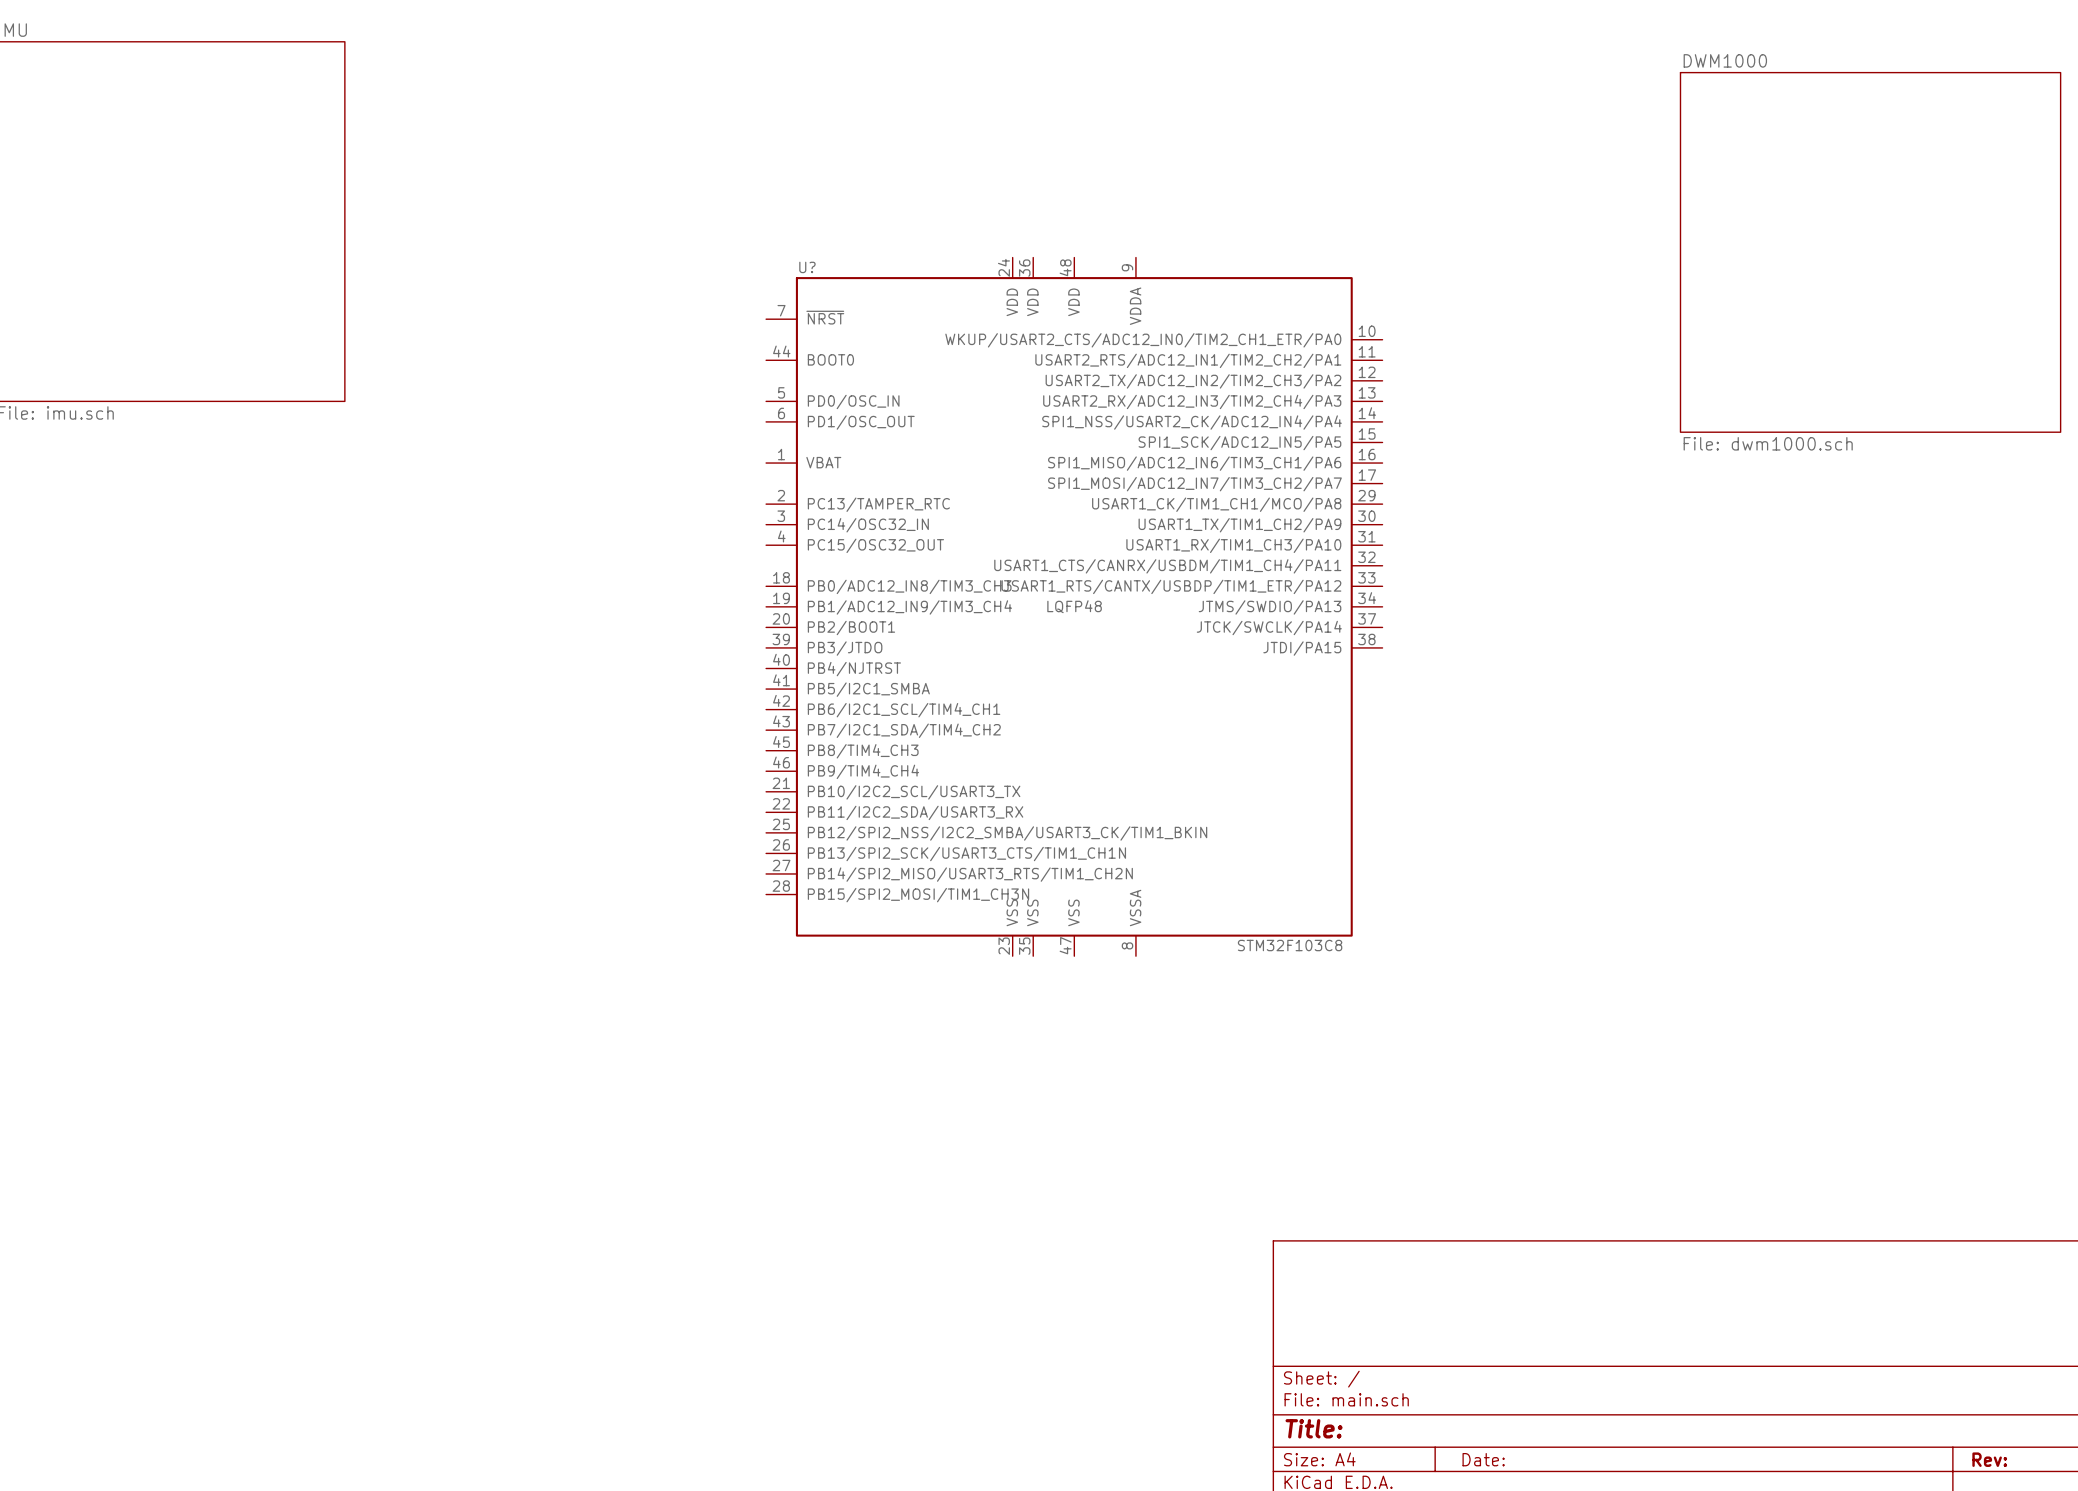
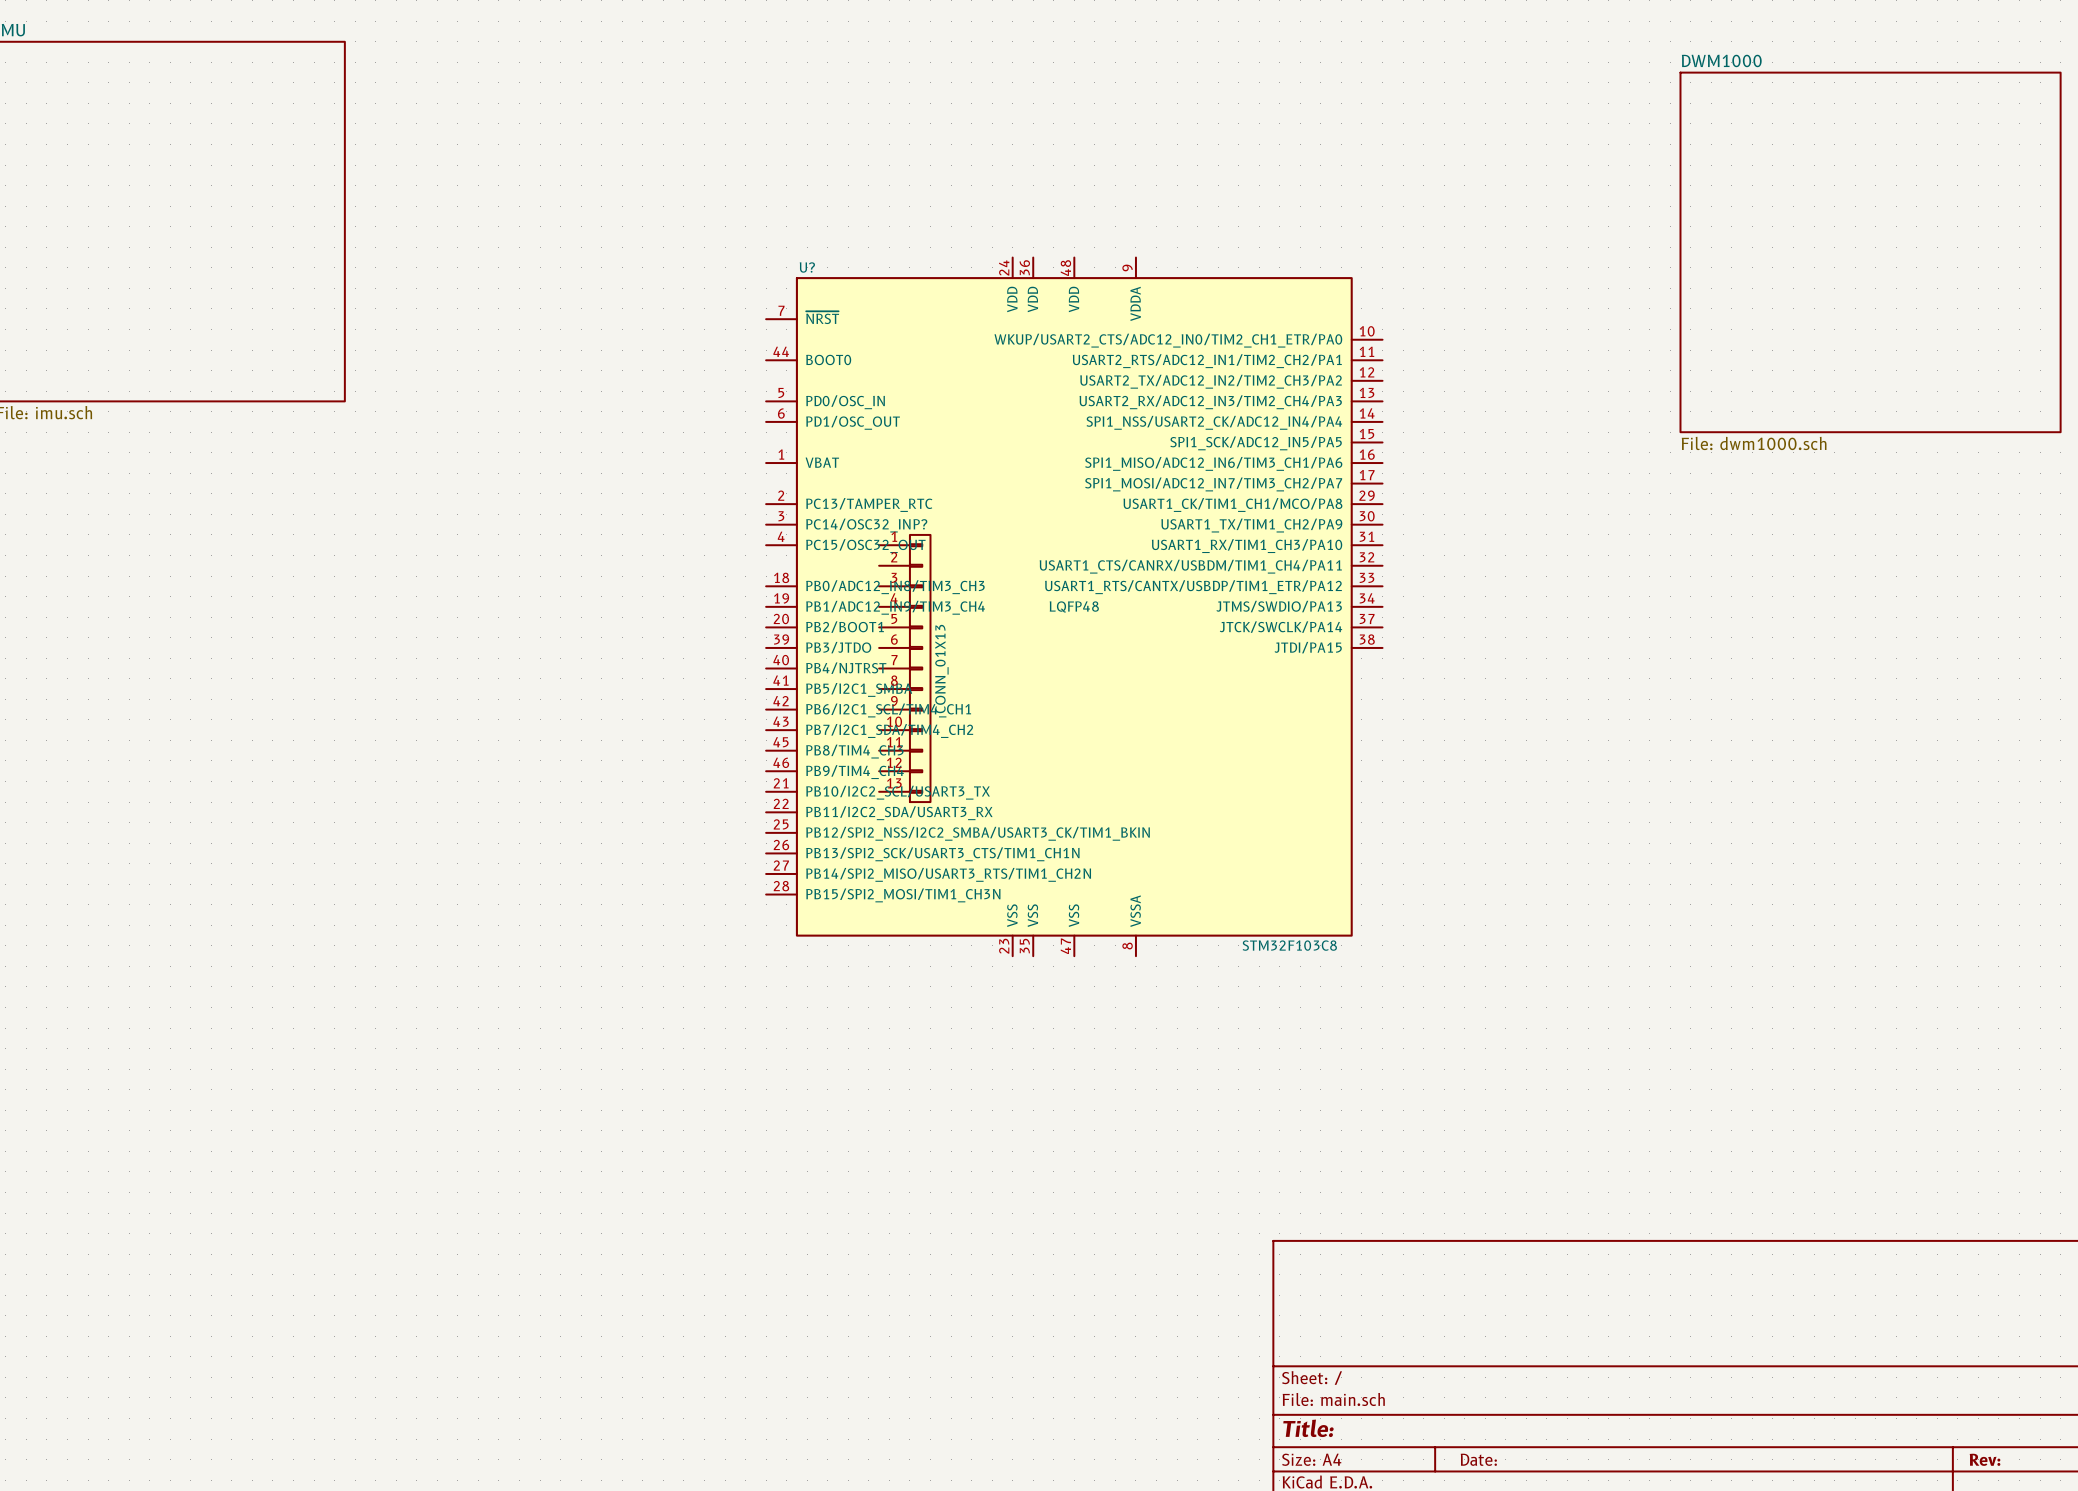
P?: none -> CONN_01X13 (904, 668)

